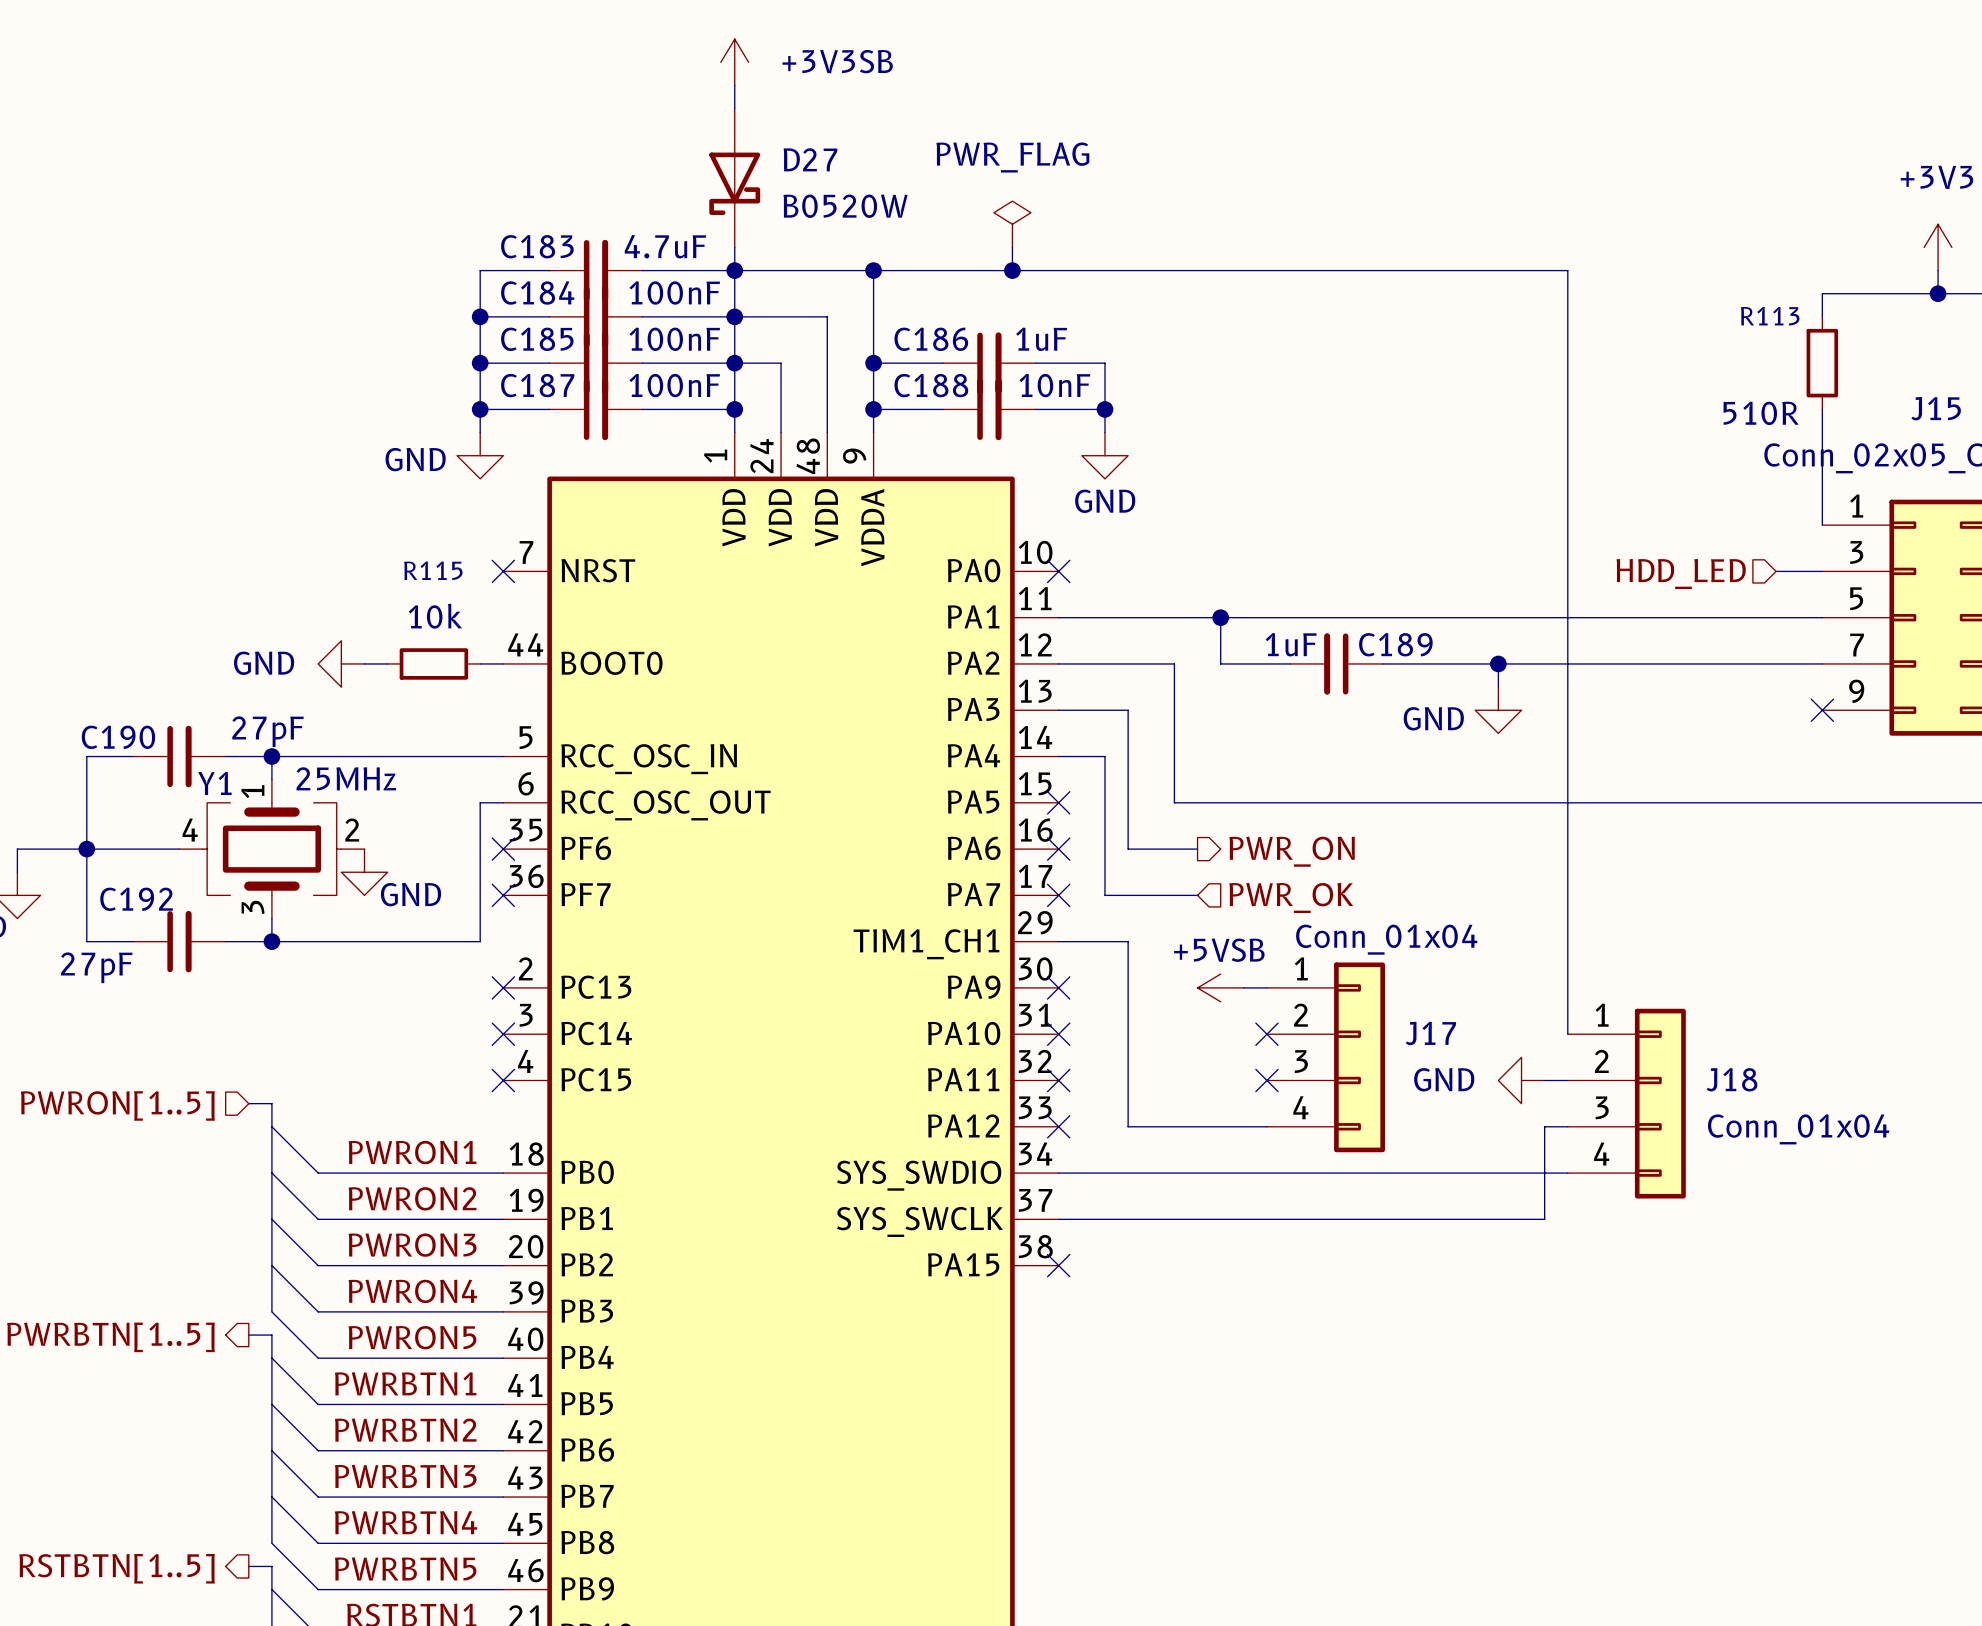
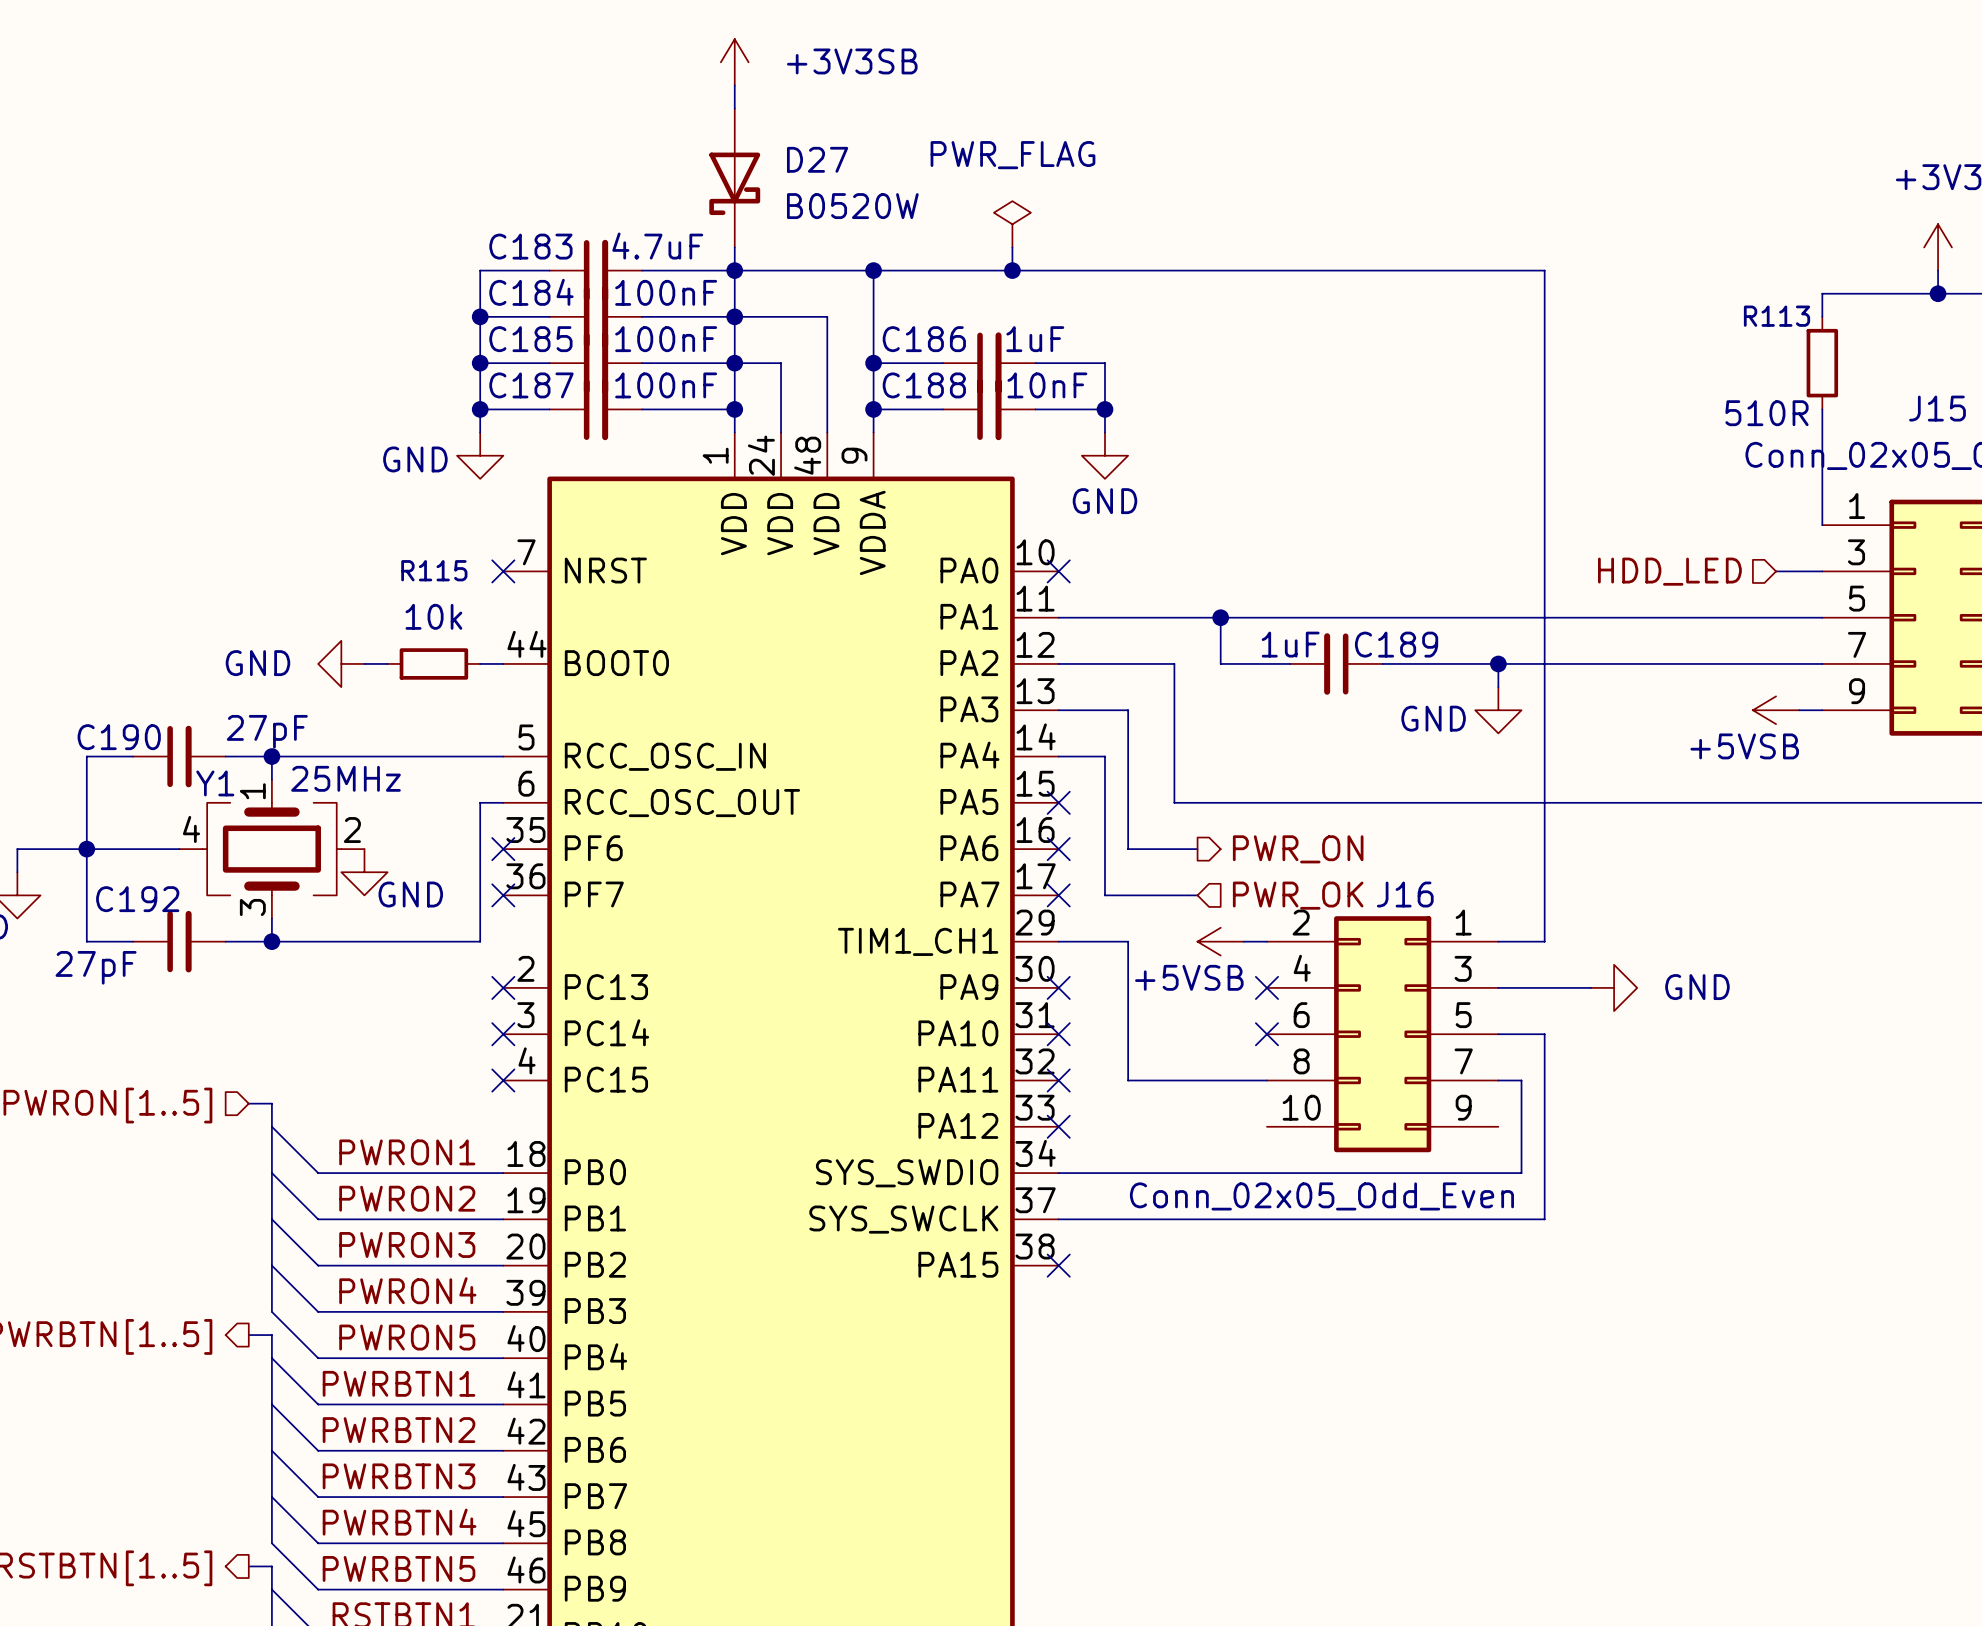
wire: (1544, 270) (1567, 270) (1567, 1034) -> (1544, 270) (1544, 941) (1498, 941)
power symbol: none -> +5VSB (1776, 710)
no-connect mark: (1822, 710) -> none
power symbol text position: +5VSB (1219, 950) -> +5VSB (1189, 977)
power symbol position: +5VSB (1220, 987) -> +5VSB (1220, 941)
wire: (1243, 987) (1266, 987) -> (1243, 941) (1266, 941)
wire: none -> (1498, 987) (1590, 987)
J16: none -> Conn_02x05_Odd_Even (1382, 1034)
J17: Conn_01x04 (1325, 1057) -> none
wire: (1128, 1080) (1128, 1126) (1266, 1126) -> (1128, 1080) (1266, 1080)
no-connect mark position: (1266, 1080) -> (1266, 987)
power symbol rotation: 0° (1521, 1080) -> 180° (1614, 987)
power symbol position: GND (1521, 1080) -> GND (1614, 987)
wire: (1544, 1080) (1567, 1080) -> (1799, 710) (1822, 710)
J18: Conn_01x04 (1626, 1103) -> none
wire: (1544, 1126) (1567, 1126) -> (1544, 1126) (1544, 1034) (1498, 1034)
wire: (1521, 1173) (1567, 1173) -> (1521, 1173) (1521, 1080) (1498, 1080)

